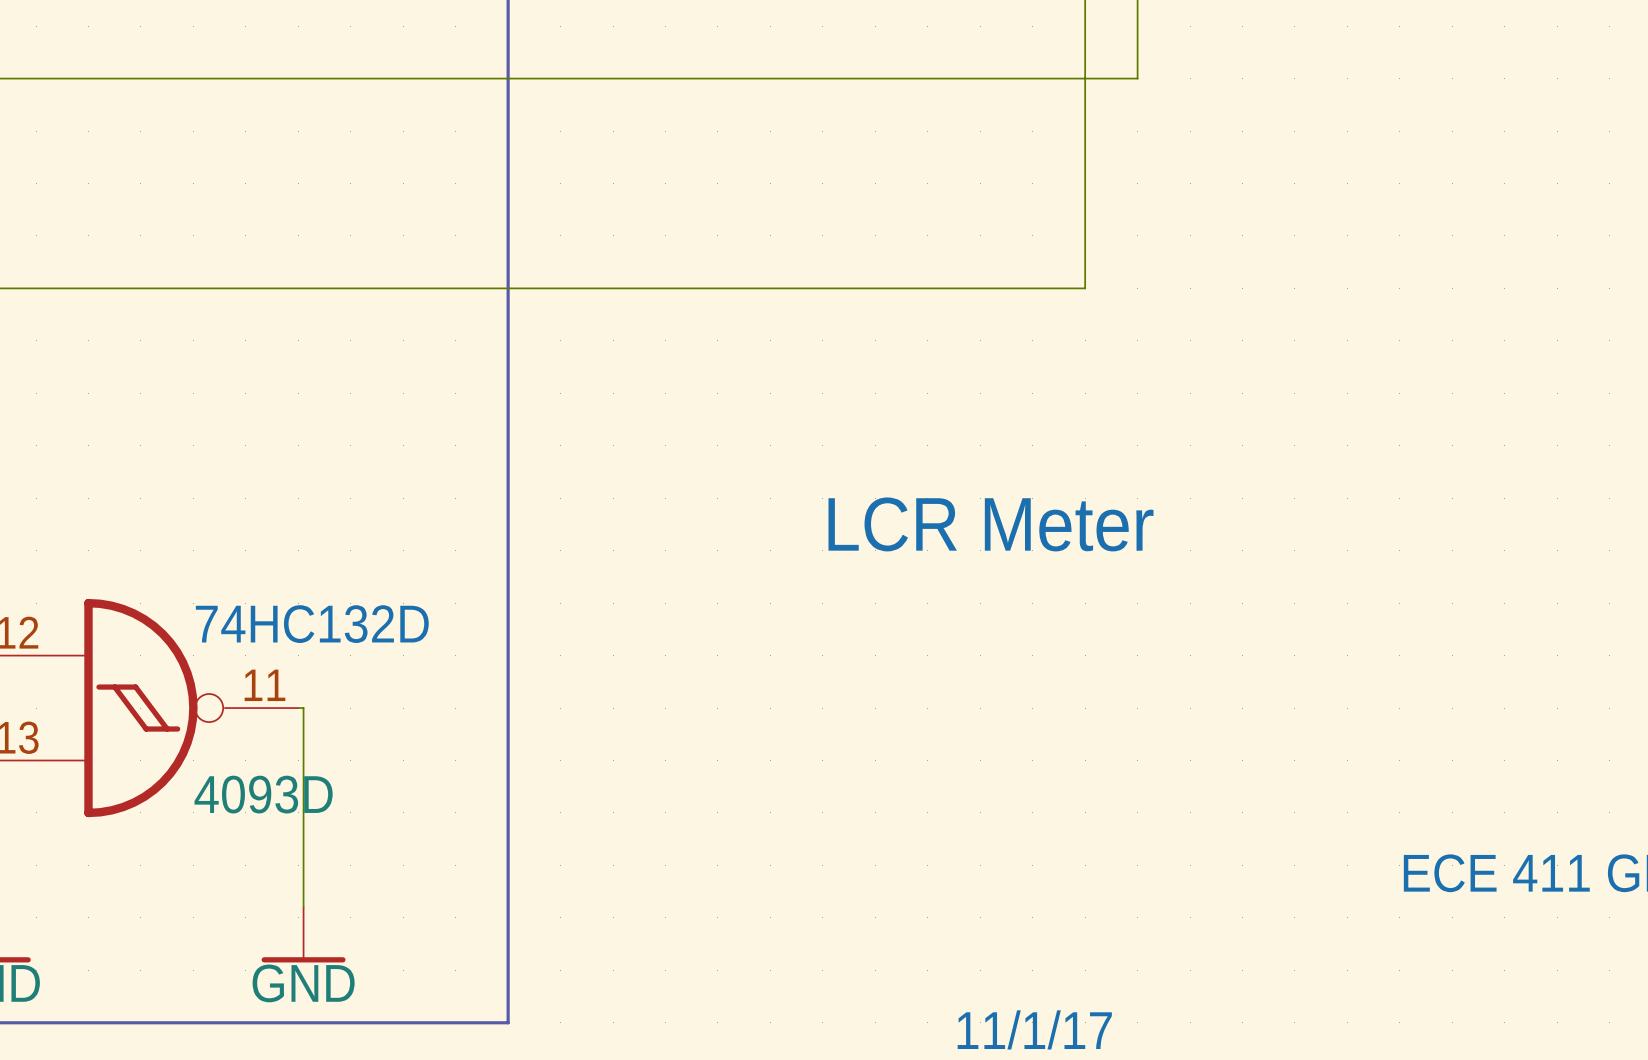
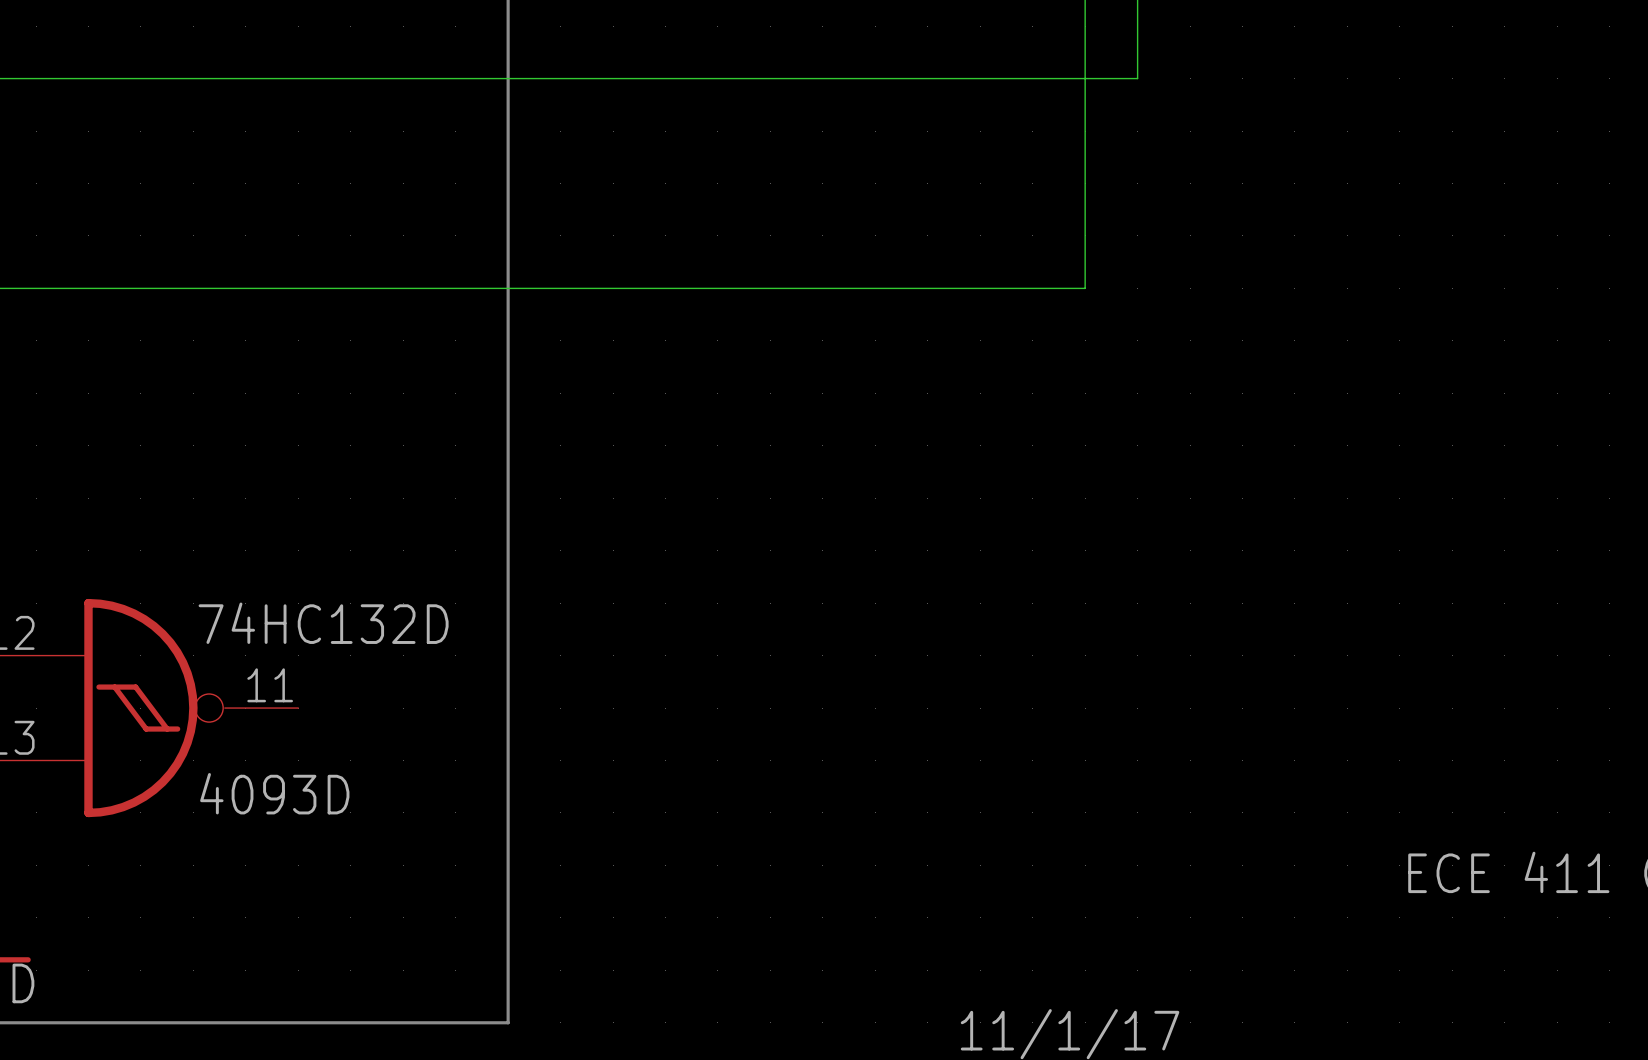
text: LCR Meter (990, 524) -> none
wire: (298, 708) (303, 708) (303, 907) -> none
power symbol: GND (303, 934) -> none

